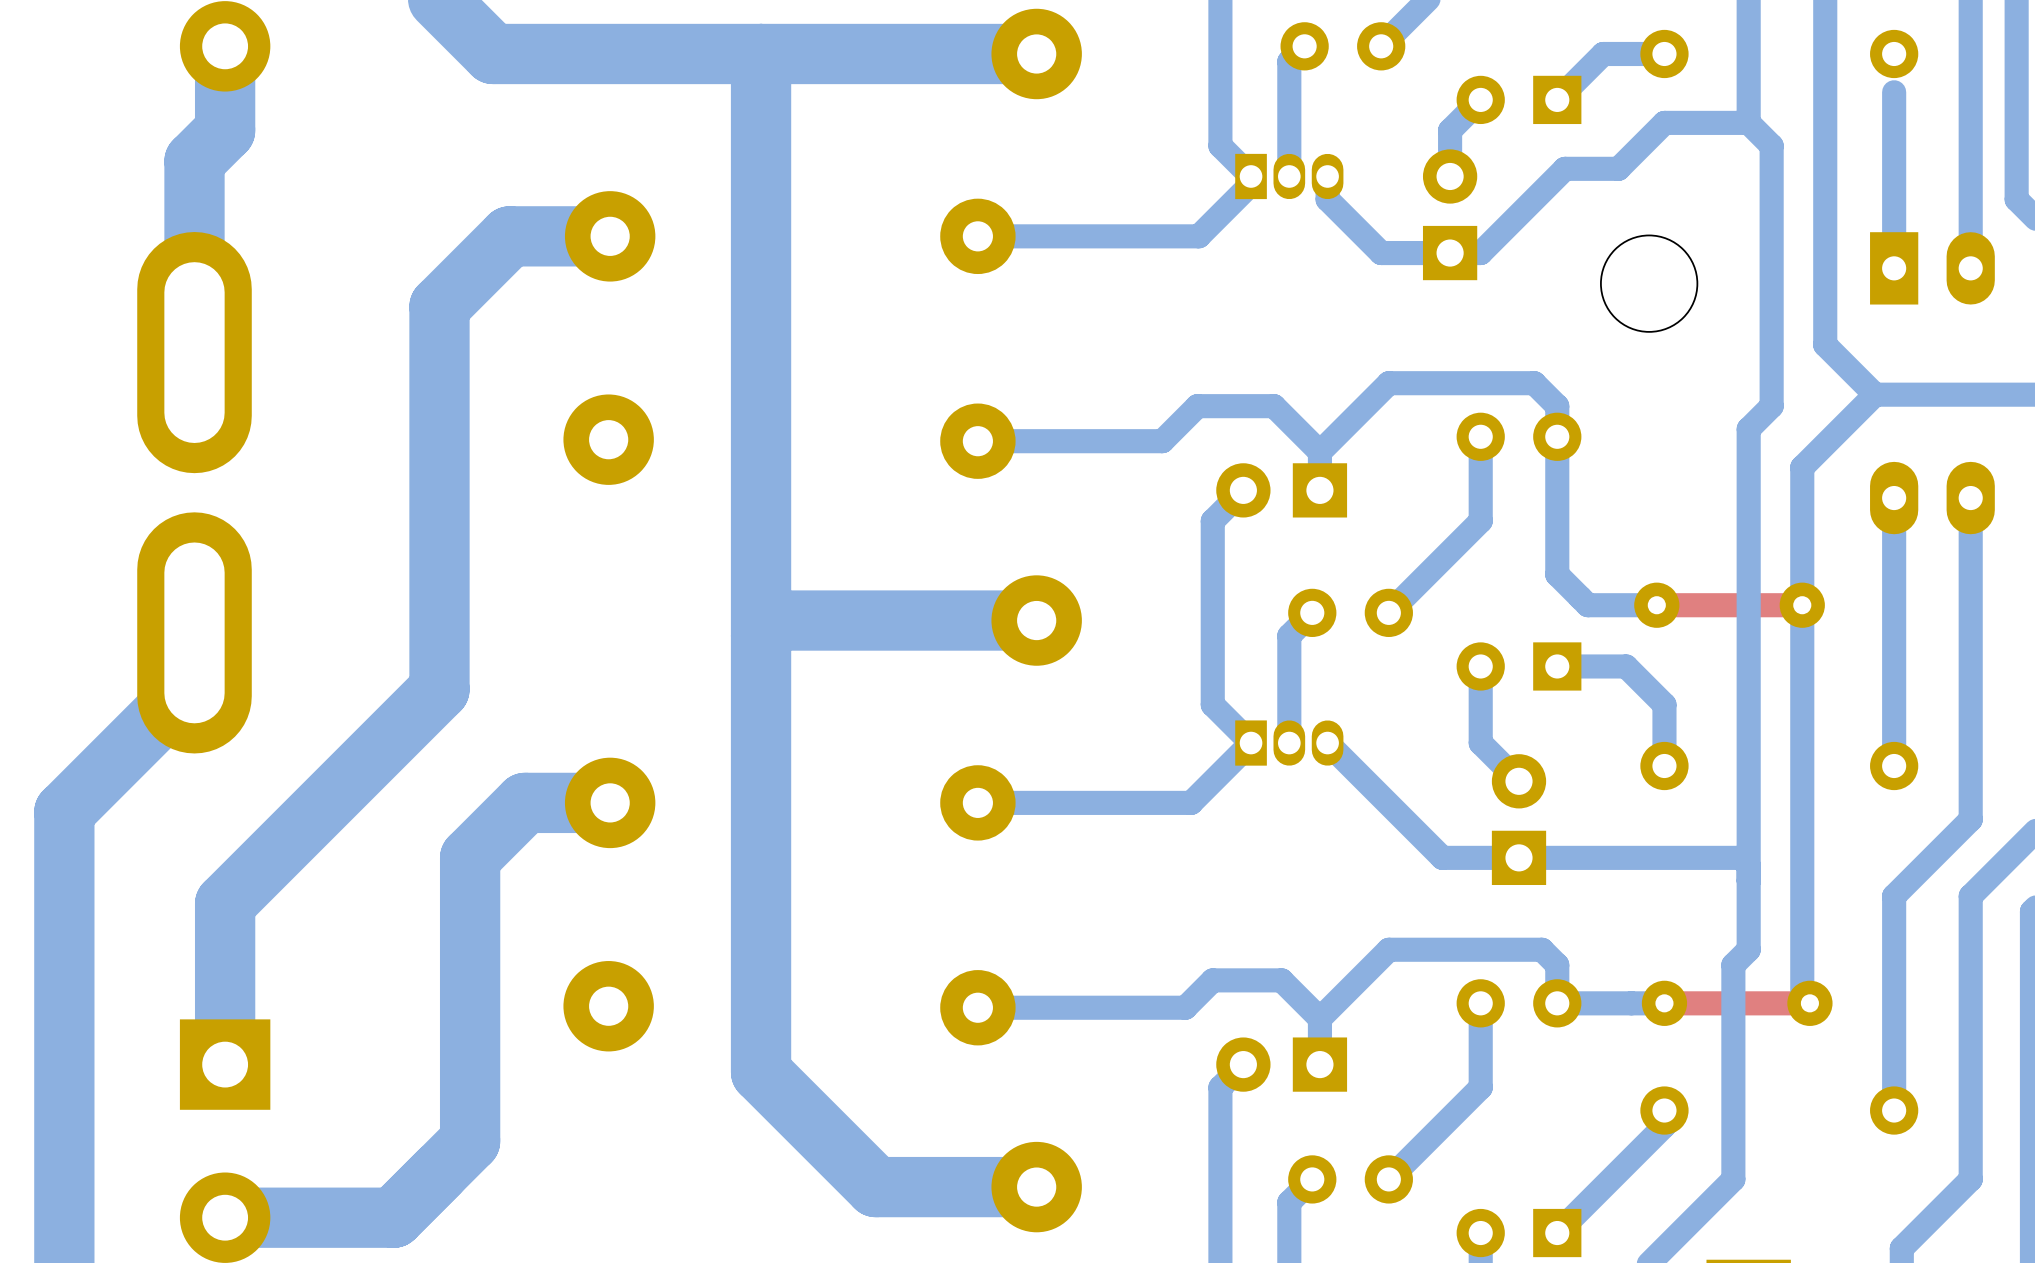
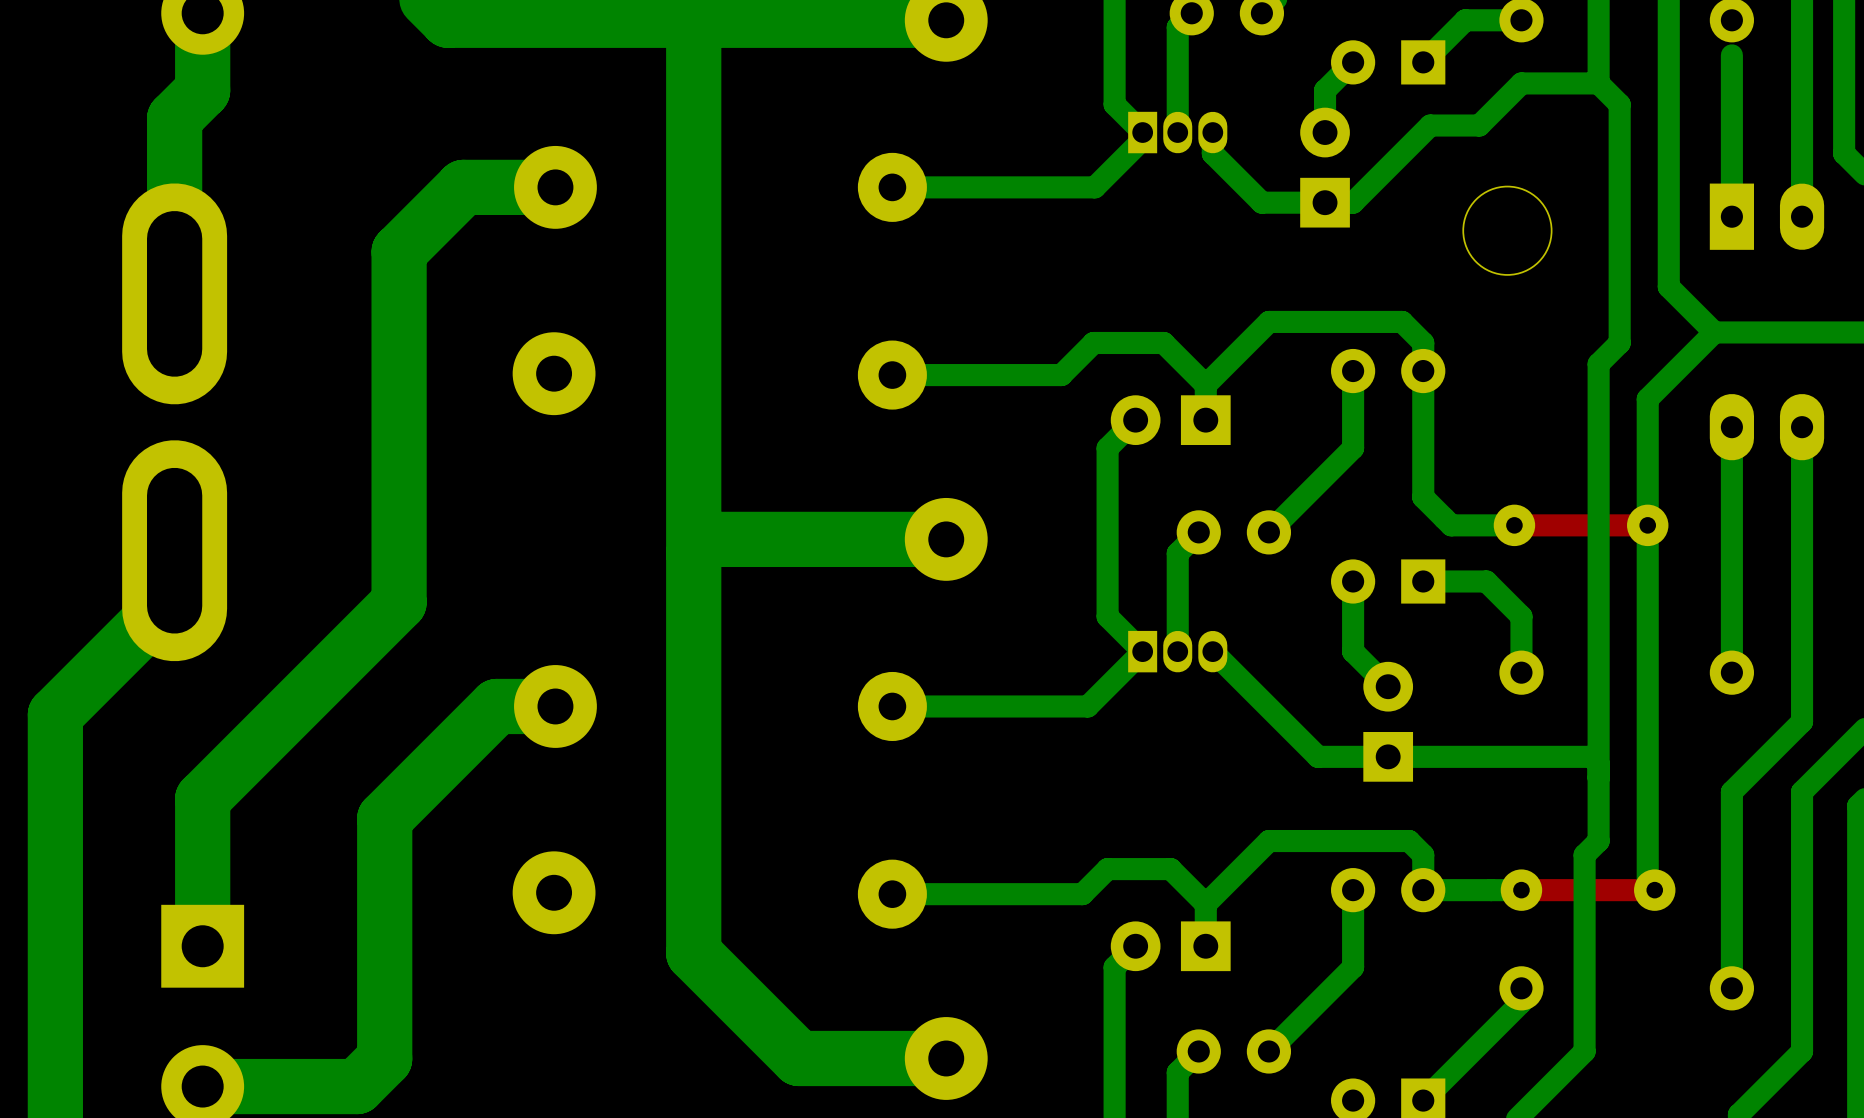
bottom track: (546, 802) (525, 802) (470, 857) (470, 1141) (423, 1187) -> (496, 706) (384, 818) (384, 1058)

